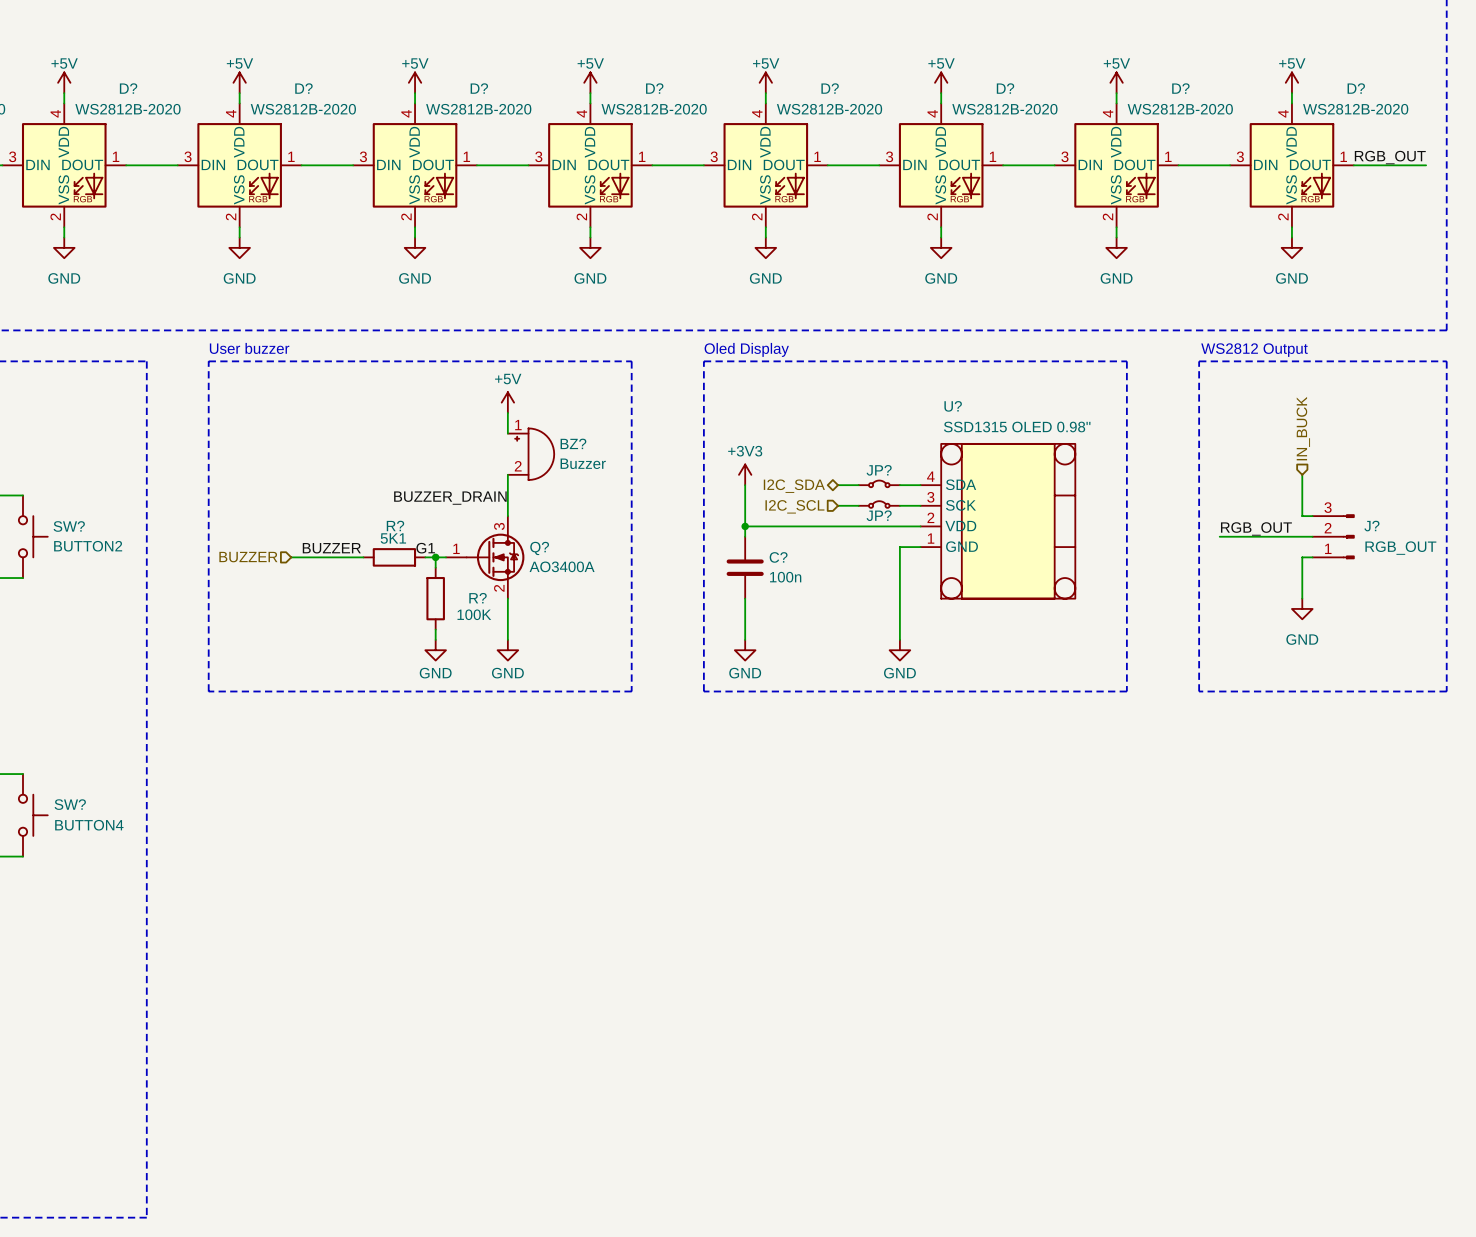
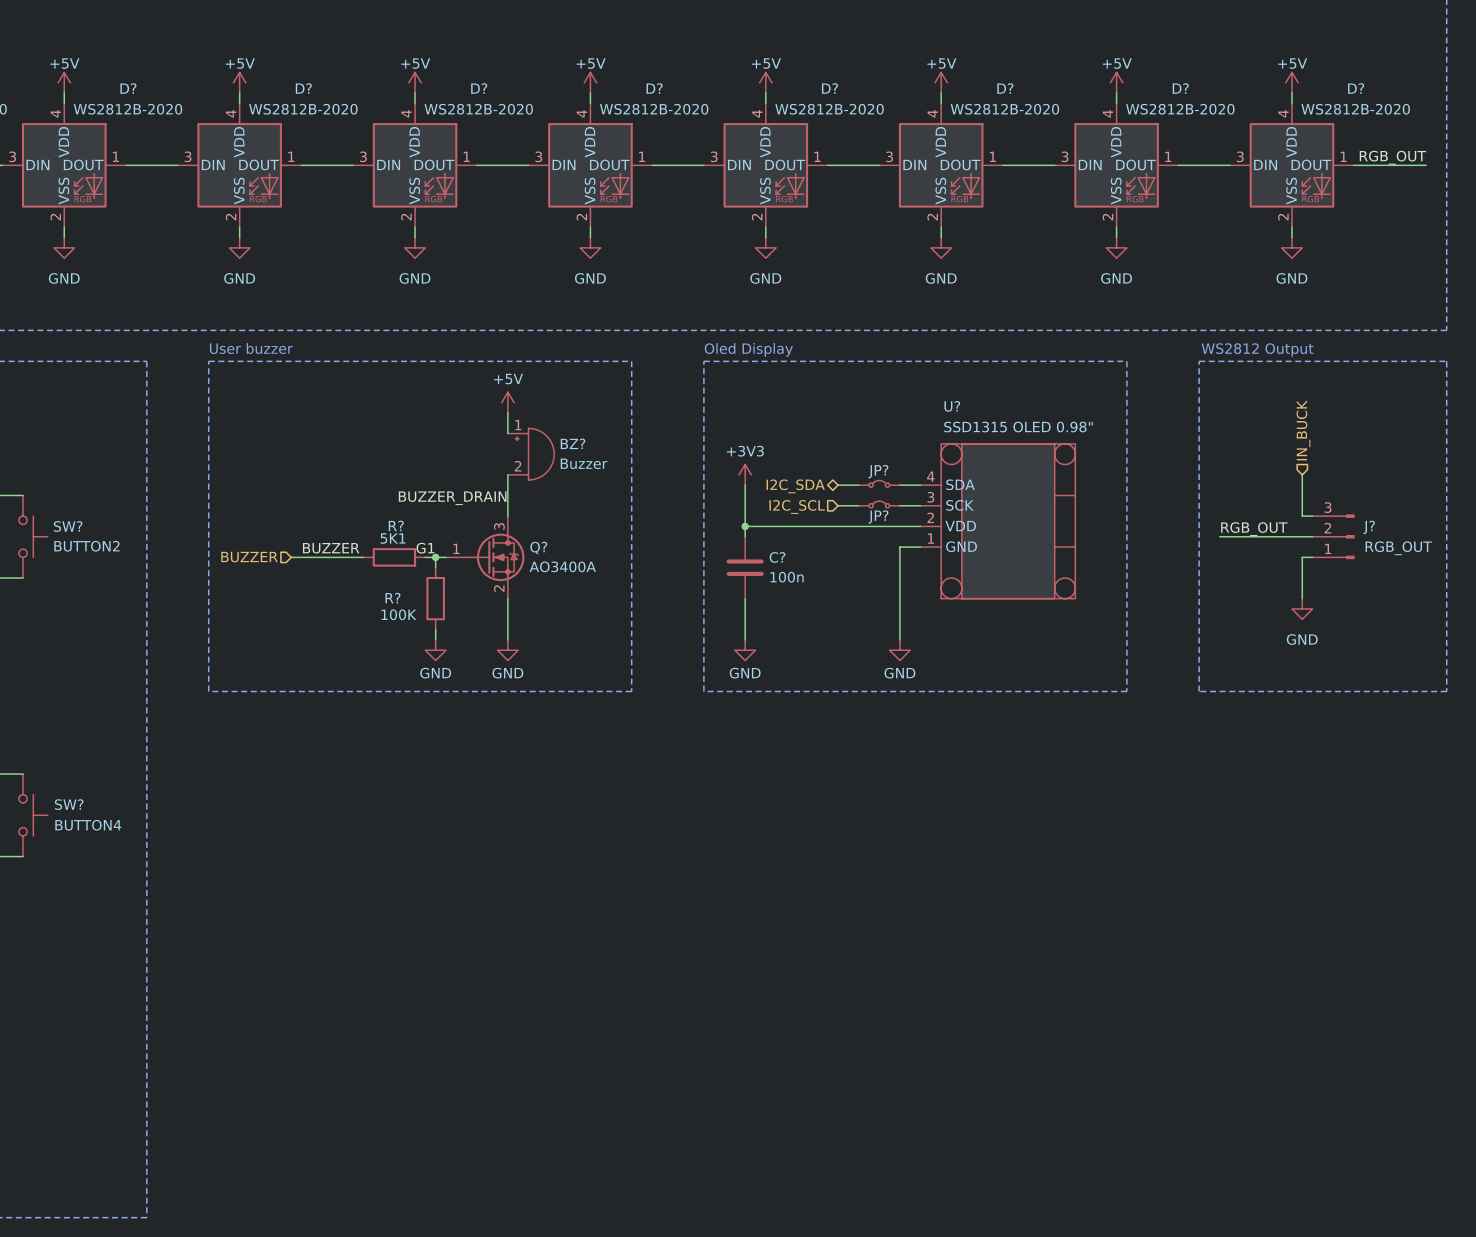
R? name position: R? (478, 598) -> R? (392, 598)
R? value position: 100K (474, 614) -> 100K (399, 614)

